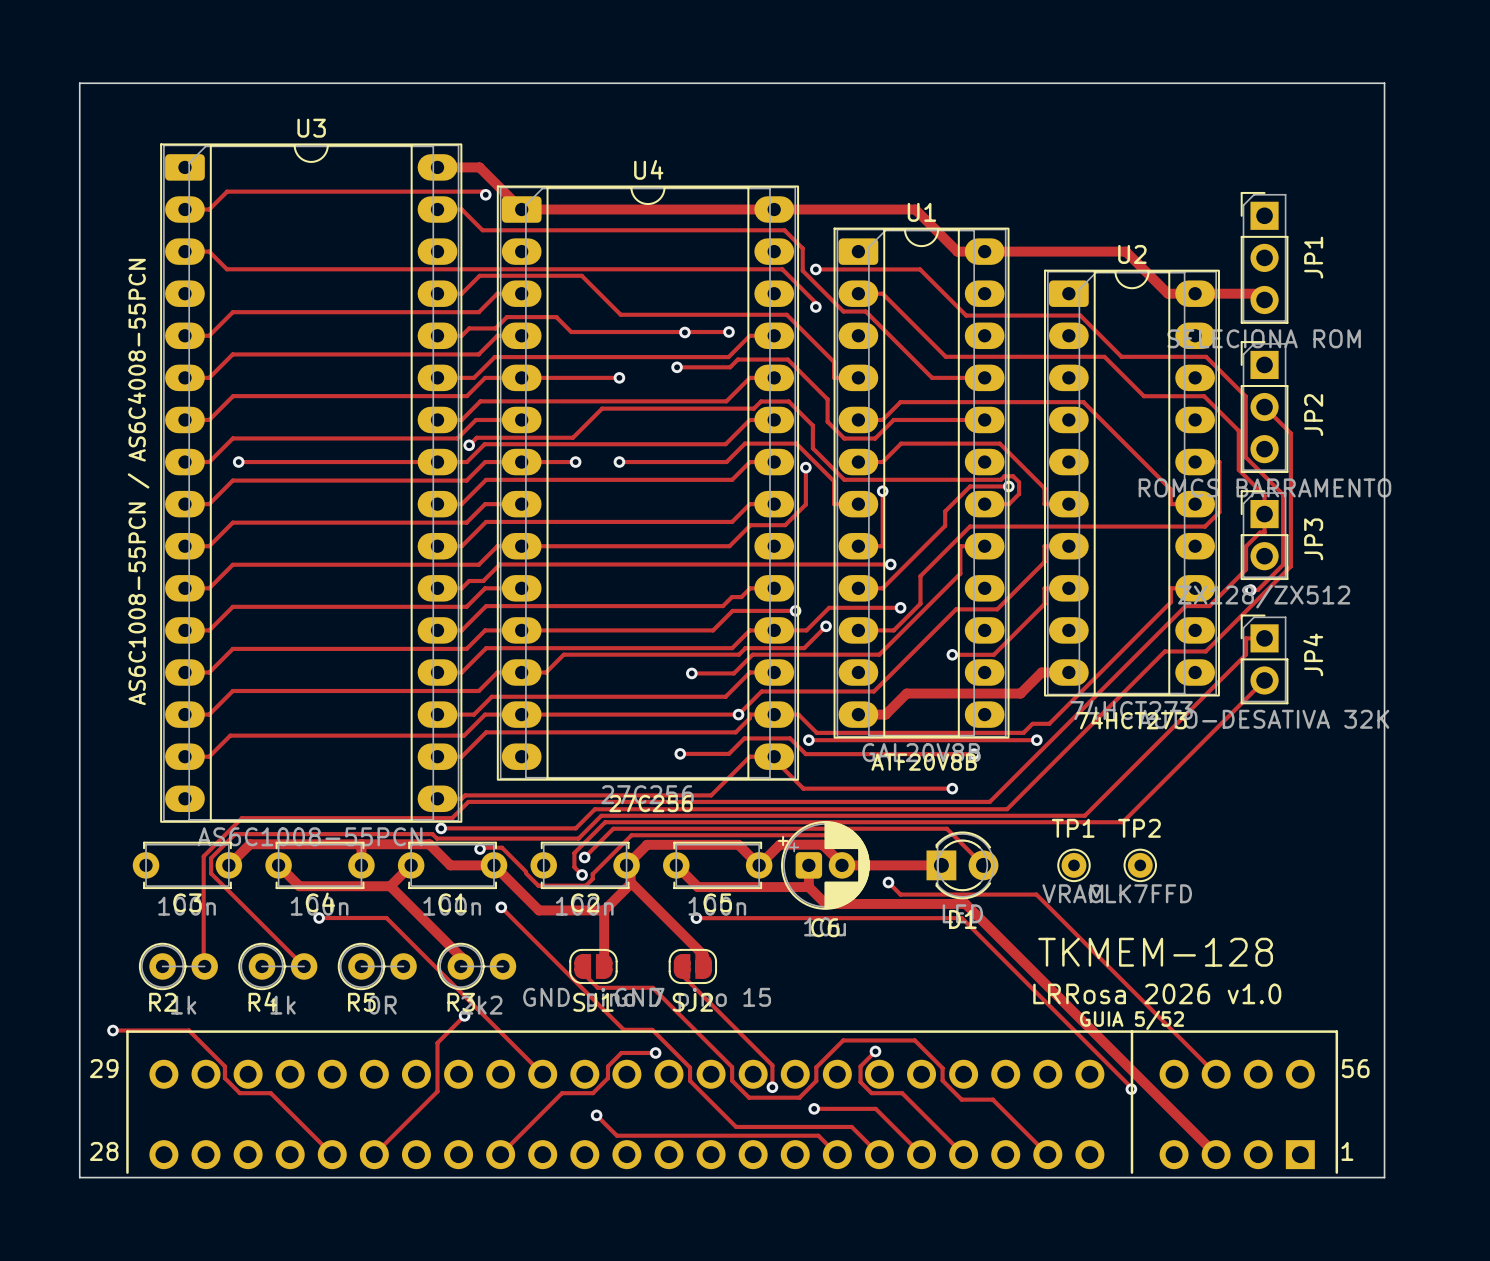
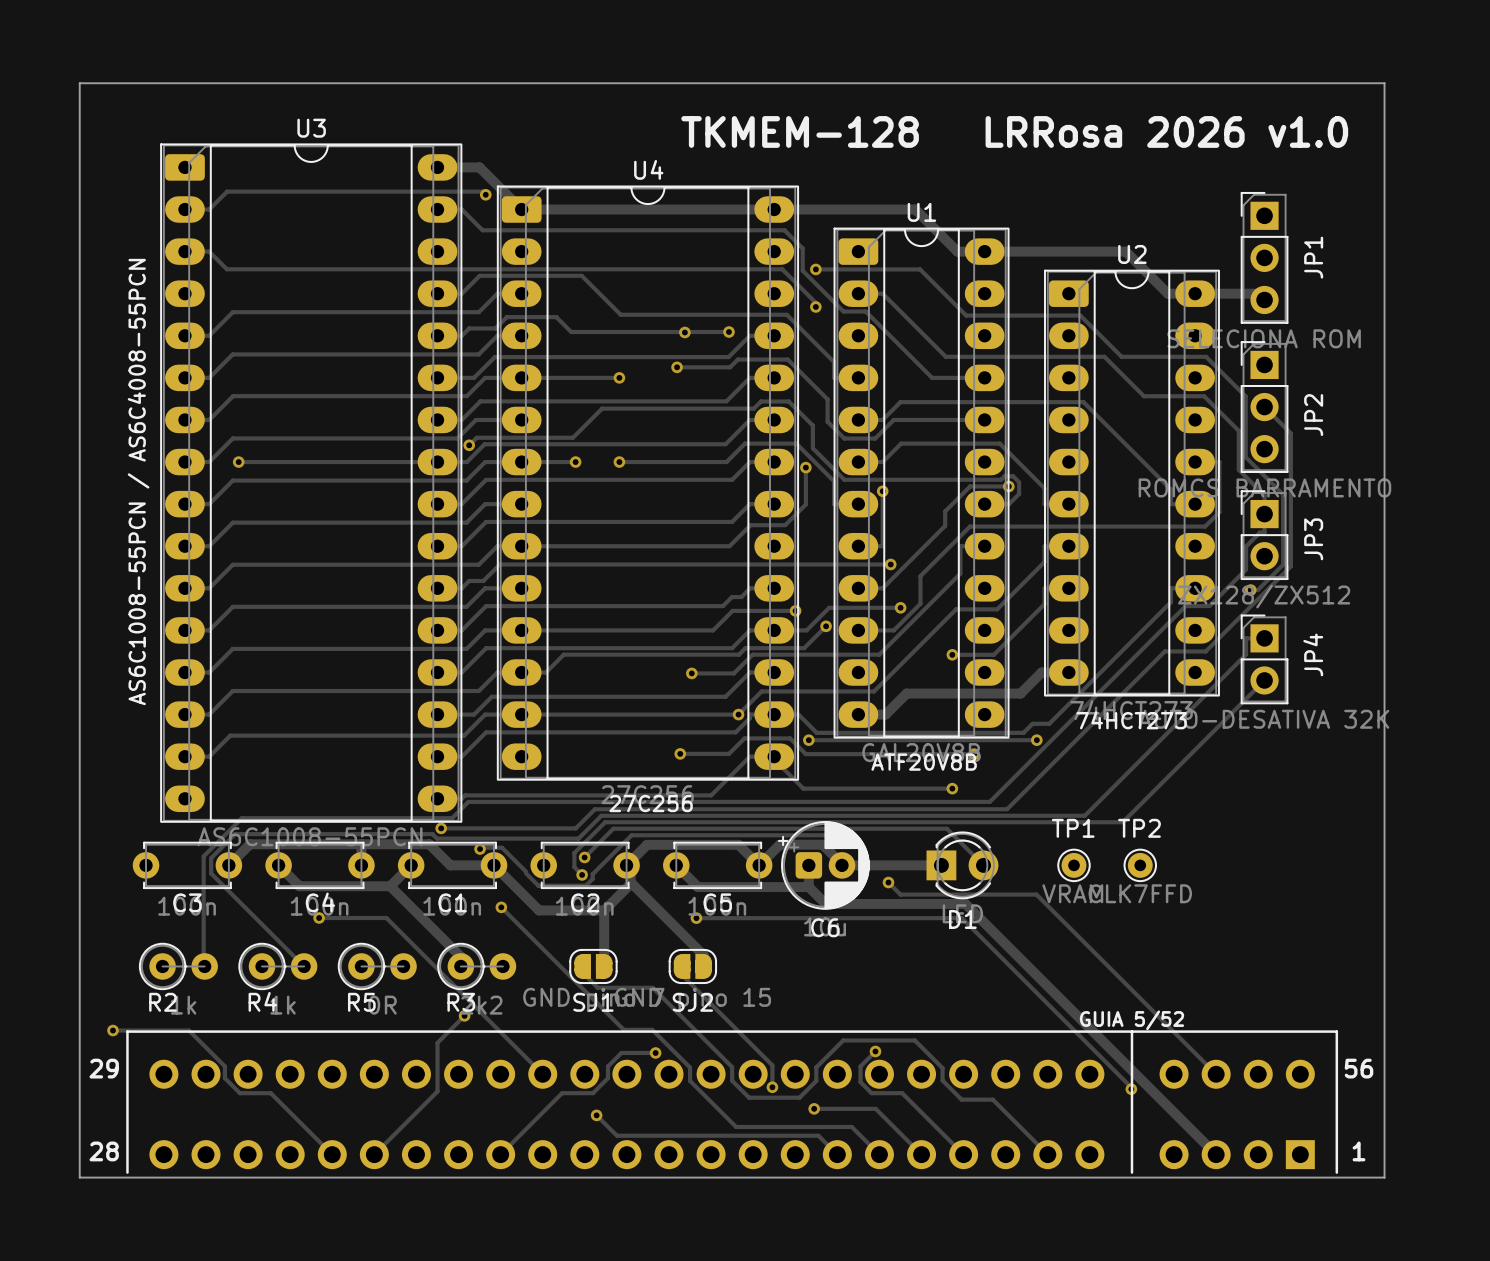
text: none -> TKMEM-128 LRRosa 2026 v1.0 (1014, 131)
text: TKMEM-128 (1155, 952) -> none
text: LRRosa 2026 v1.0 (1157, 993) -> none
part footprint: [126, 1030, 1339, 1174] -> [126, 1030, 1339, 1174]

